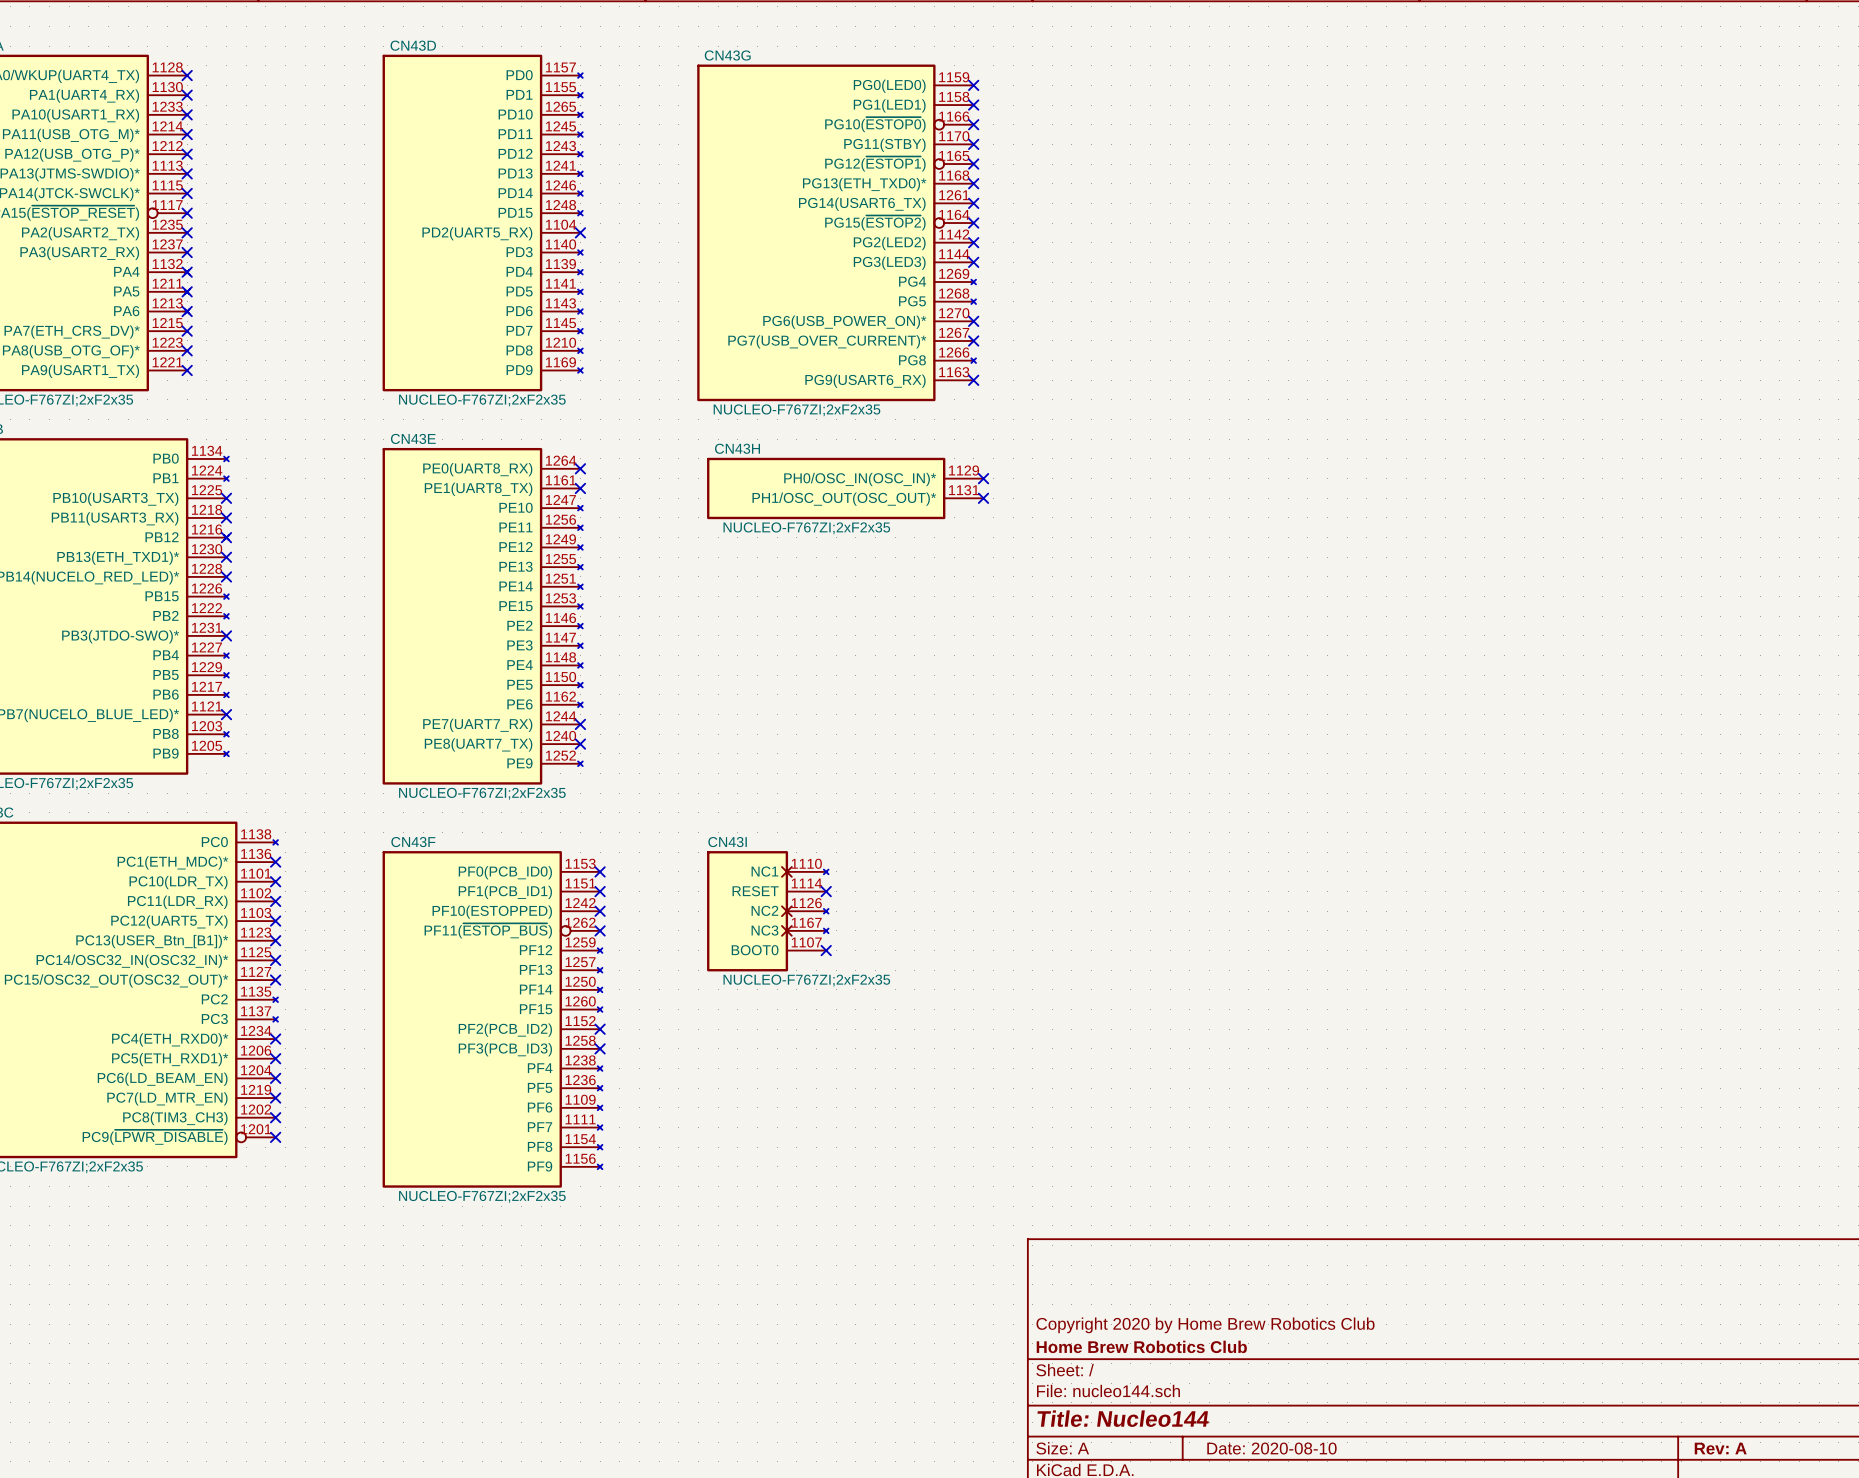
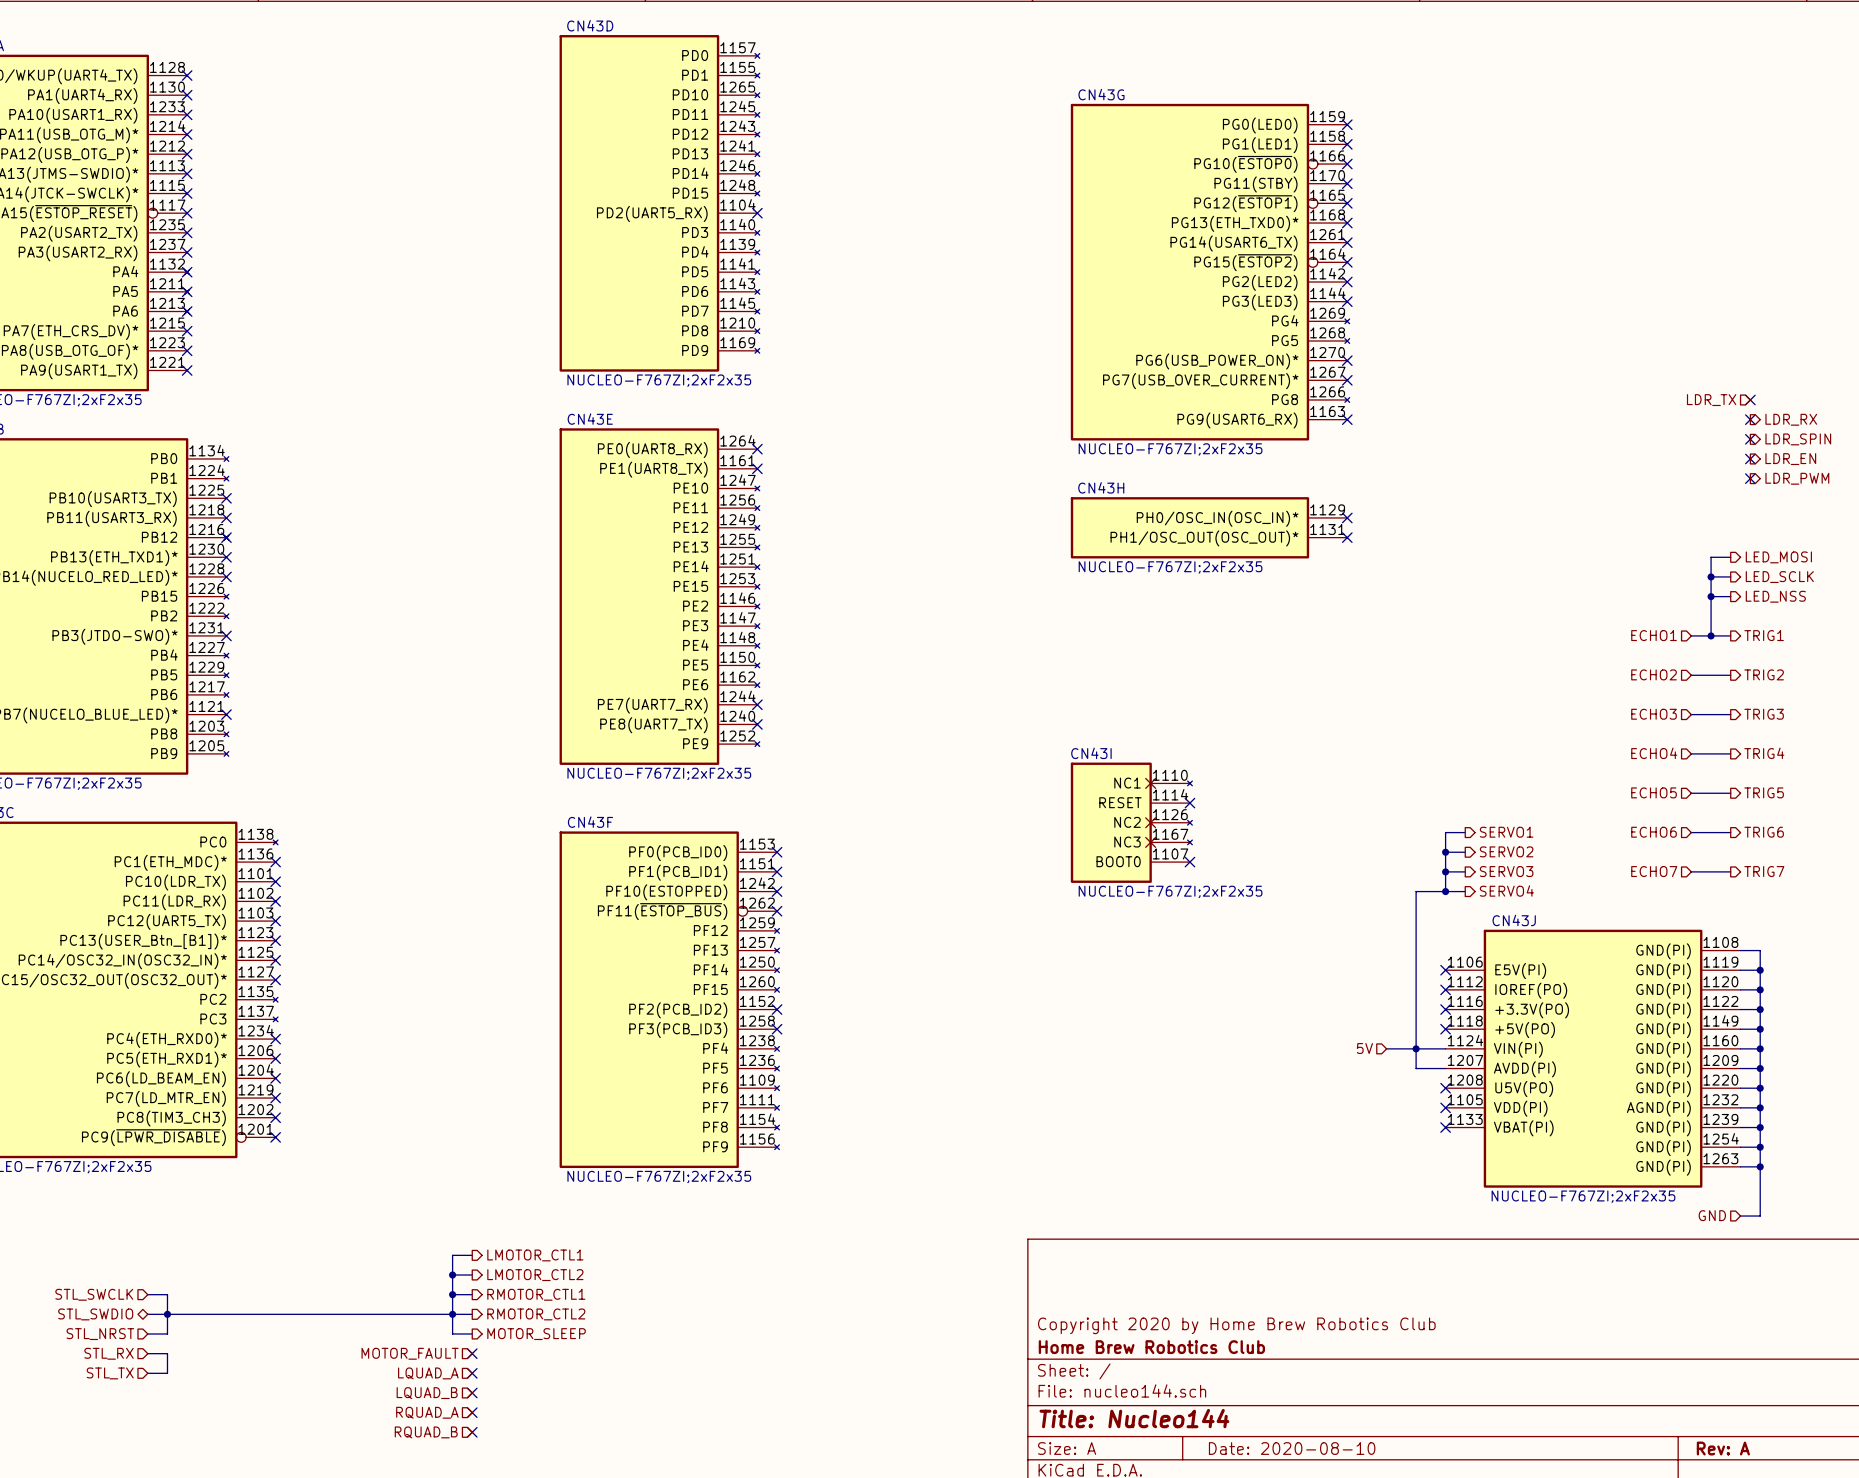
no-connect mark: (973, 85) -> none
no-connect mark: (973, 105) -> none
no-connect mark: (973, 124) -> none
no-connect mark: none -> (1347, 124)
no-connect mark: (973, 144) -> none
no-connect mark: none -> (1347, 144)
no-connect mark: (973, 164) -> none
no-connect mark: none -> (1347, 164)
no-connect mark: (973, 183) -> none
no-connect mark: none -> (1347, 183)
no-connect mark: (973, 203) -> none
no-connect mark: none -> (1347, 203)
no-connect mark: none -> (757, 213)
CN43D position: (482, 223) -> (659, 203)
no-connect mark: (973, 223) -> none
no-connect mark: none -> (1347, 223)
no-connect mark: (580, 232) -> none
CN43G position: (836, 232) -> (1210, 272)
no-connect mark: (973, 242) -> none
no-connect mark: none -> (1347, 242)
no-connect mark: (973, 262) -> none
no-connect mark: none -> (1347, 262)
no-connect mark: none -> (1347, 282)
no-connect mark: none -> (1347, 301)
no-connect mark: (973, 321) -> none
no-connect mark: (973, 340) -> none
no-connect mark: none -> (1347, 360)
no-connect mark: (973, 380) -> none
no-connect mark: none -> (1347, 380)
no-connect mark: none -> (1750, 399)
hierarchical label: none -> LDR_TX (1711, 400)
no-connect mark: none -> (1347, 419)
no-connect mark: none -> (1750, 419)
hierarchical label: none -> LDR_RX (1791, 419)
no-connect mark: none -> (1750, 439)
hierarchical label: none -> LDR_SPIN (1798, 439)
no-connect mark: none -> (757, 449)
no-connect mark: none -> (1750, 458)
hierarchical label: none -> LDR_EN (1790, 459)
no-connect mark: (580, 468) -> none
no-connect mark: none -> (757, 468)
no-connect mark: (983, 478) -> none
no-connect mark: none -> (1750, 478)
hierarchical label: none -> LDR_PWM (1797, 478)
no-connect mark: (580, 488) -> none
CN43H position: (845, 488) -> (1209, 527)
no-connect mark: (983, 498) -> none
no-connect mark: none -> (1347, 517)
no-connect mark: none -> (1347, 537)
wire: none -> (1730, 557) (1711, 557) (1711, 635)
hierarchical label: none -> LED_MOSI (1778, 557)
wire: none -> (1711, 576) (1730, 576)
junction: none -> (1711, 576)
hierarchical label: none -> LED_SCLK (1779, 577)
wire: none -> (1711, 596) (1730, 596)
junction: none -> (1711, 596)
hierarchical label: none -> LED_NSS (1775, 596)
CN43E position: (482, 616) -> (659, 596)
hierarchical label: none -> ECHO1 (1654, 635)
wire: none -> (1691, 635) (1730, 635)
junction: none -> (1711, 635)
hierarchical label: none -> TRIG1 (1764, 635)
hierarchical label: none -> ECHO2 (1654, 674)
hierarchical label: none -> TRIG2 (1764, 674)
wire: none -> (1691, 675) (1730, 675)
no-connect mark: none -> (757, 704)
hierarchical label: none -> ECHO3 (1654, 714)
wire: none -> (1691, 714) (1730, 714)
hierarchical label: none -> TRIG3 (1764, 714)
no-connect mark: (580, 724) -> none
no-connect mark: none -> (757, 724)
no-connect mark: (580, 744) -> none
hierarchical label: none -> ECHO4 (1654, 753)
wire: none -> (1691, 753) (1730, 753)
hierarchical label: none -> TRIG4 (1764, 753)
hierarchical label: none -> ECHO5 (1654, 792)
hierarchical label: none -> TRIG5 (1764, 792)
wire: none -> (1691, 793) (1730, 793)
no-connect mark: none -> (1189, 803)
wire: none -> (1465, 832) (1445, 832) (1445, 891)
hierarchical label: none -> SERVO1 (1506, 832)
hierarchical label: none -> ECHO6 (1654, 832)
wire: none -> (1691, 832) (1730, 832)
hierarchical label: none -> TRIG6 (1764, 832)
hierarchical label: none -> SERVO2 (1506, 851)
no-connect mark: none -> (777, 852)
wire: none -> (1445, 852) (1465, 852)
junction: none -> (1445, 852)
no-connect mark: none -> (1189, 862)
no-connect mark: (600, 871) -> none
no-connect mark: none -> (777, 871)
wire: none -> (1445, 871) (1465, 871)
junction: none -> (1445, 871)
hierarchical label: none -> SERVO3 (1506, 871)
hierarchical label: none -> ECHO7 (1654, 871)
wire: none -> (1691, 871) (1730, 871)
hierarchical label: none -> TRIG7 (1764, 871)
no-connect mark: (600, 891) -> none
no-connect mark: none -> (777, 891)
no-connect mark: (826, 891) -> none
junction: none -> (1445, 891)
wire: none -> (1465, 891) (1416, 891) (1416, 1068) (1445, 1068)
hierarchical label: none -> SERVO4 (1506, 890)
no-connect mark: (600, 911) -> none
CN43I position: (767, 911) -> (1131, 822)
no-connect mark: none -> (777, 911)
no-connect mark: (600, 930) -> none
no-connect mark: (826, 950) -> none
wire: none -> (1740, 950) (1760, 950) (1760, 1216) (1740, 1216)
no-connect mark: none -> (1445, 970)
wire: none -> (1740, 970) (1760, 970)
junction: none -> (1760, 970)
no-connect mark: none -> (1445, 989)
wire: none -> (1740, 989) (1760, 989)
junction: none -> (1760, 989)
no-connect mark: none -> (777, 1009)
no-connect mark: none -> (1445, 1009)
wire: none -> (1740, 1009) (1760, 1009)
junction: none -> (1760, 1009)
CN43F position: (492, 1019) -> (669, 999)
no-connect mark: (600, 1029) -> none
no-connect mark: none -> (777, 1029)
no-connect mark: none -> (1445, 1029)
wire: none -> (1740, 1029) (1760, 1029)
junction: none -> (1760, 1029)
no-connect mark: (600, 1048) -> none
hierarchical label: none -> 5V (1364, 1048)
wire: none -> (1386, 1048) (1445, 1048)
junction: none -> (1416, 1048)
wire: none -> (1740, 1048) (1760, 1048)
junction: none -> (1760, 1048)
CN43J: none -> NUCLEO-F767ZI;2xF2x35 (1593, 1058)
wire: none -> (1740, 1068) (1760, 1068)
junction: none -> (1760, 1068)
no-connect mark: none -> (1445, 1088)
wire: none -> (1740, 1088) (1760, 1088)
junction: none -> (1760, 1088)
no-connect mark: none -> (1445, 1107)
wire: none -> (1740, 1107) (1760, 1107)
junction: none -> (1760, 1107)
no-connect mark: none -> (1445, 1127)
wire: none -> (1740, 1127) (1760, 1127)
junction: none -> (1760, 1127)
wire: none -> (1740, 1147) (1760, 1147)
junction: none -> (1760, 1147)
wire: none -> (1740, 1166) (1760, 1166)
junction: none -> (1760, 1166)
hierarchical label: none -> GND (1712, 1215)
wire: none -> (472, 1255) (452, 1255) (452, 1334) (472, 1334)
hierarchical label: none -> LMOTOR_CTL1 (535, 1255)
wire: none -> (452, 1275) (472, 1275)
junction: none -> (452, 1275)
hierarchical label: none -> LMOTOR_CTL2 (535, 1275)
wire: none -> (147, 1294) (167, 1294) (167, 1334) (147, 1334)
wire: none -> (452, 1294) (472, 1294)
junction: none -> (452, 1294)
hierarchical label: none -> STL_SWCLK (94, 1294)
hierarchical label: none -> RMOTOR_CTL1 (536, 1294)
wire: none -> (147, 1314) (472, 1314)
junction: none -> (167, 1314)
junction: none -> (452, 1314)
hierarchical label: none -> STL_SWDIO (95, 1314)
hierarchical label: none -> RMOTOR_CTL2 (536, 1314)
hierarchical label: none -> STL_NRST (100, 1334)
hierarchical label: none -> MOTOR_SLEEP (536, 1334)
wire: none -> (147, 1353) (167, 1353) (167, 1373) (147, 1373)
no-connect mark: none -> (472, 1353)
hierarchical label: none -> STL_RX (109, 1353)
hierarchical label: none -> MOTOR_FAULT (410, 1353)
no-connect mark: none -> (472, 1373)
hierarchical label: none -> STL_TX (110, 1373)
hierarchical label: none -> LQUAD_A (428, 1373)
no-connect mark: none -> (472, 1392)
hierarchical label: none -> LQUAD_B (427, 1393)
no-connect mark: none -> (472, 1412)
hierarchical label: none -> RQUAD_A (427, 1412)
no-connect mark: none -> (472, 1432)
hierarchical label: none -> RQUAD_B (426, 1432)

